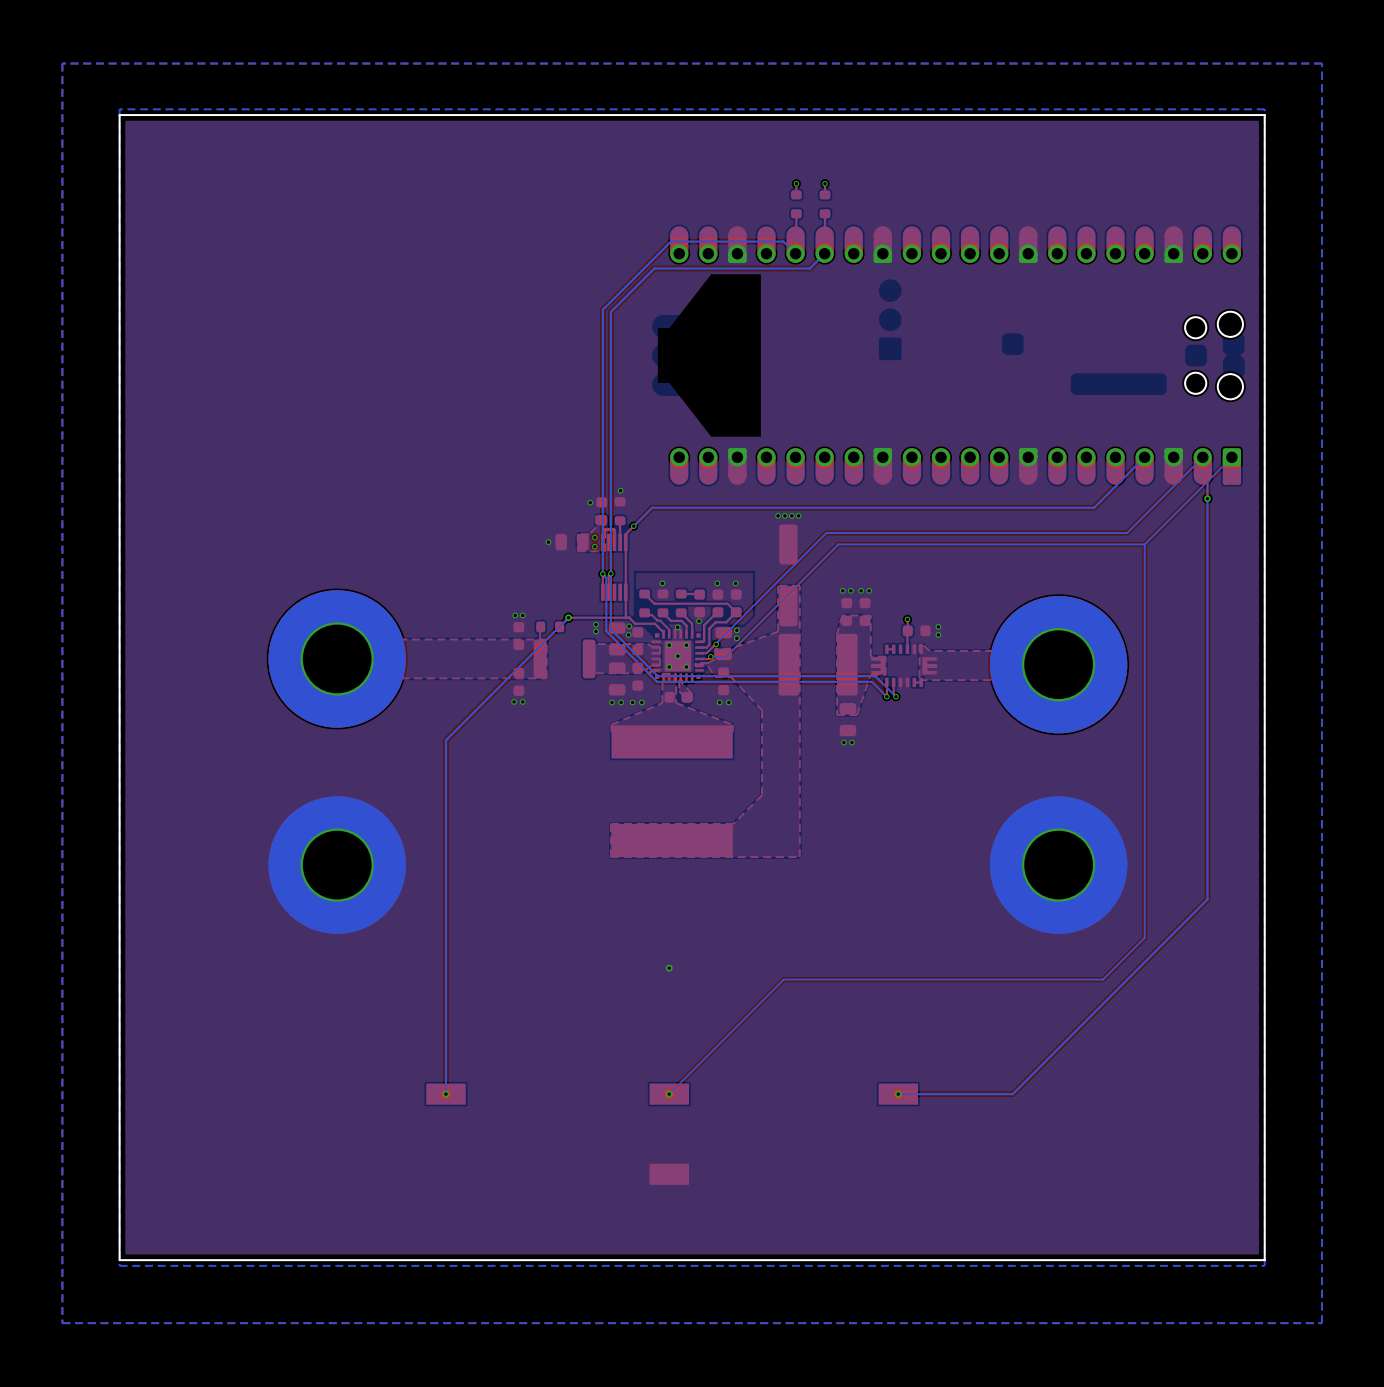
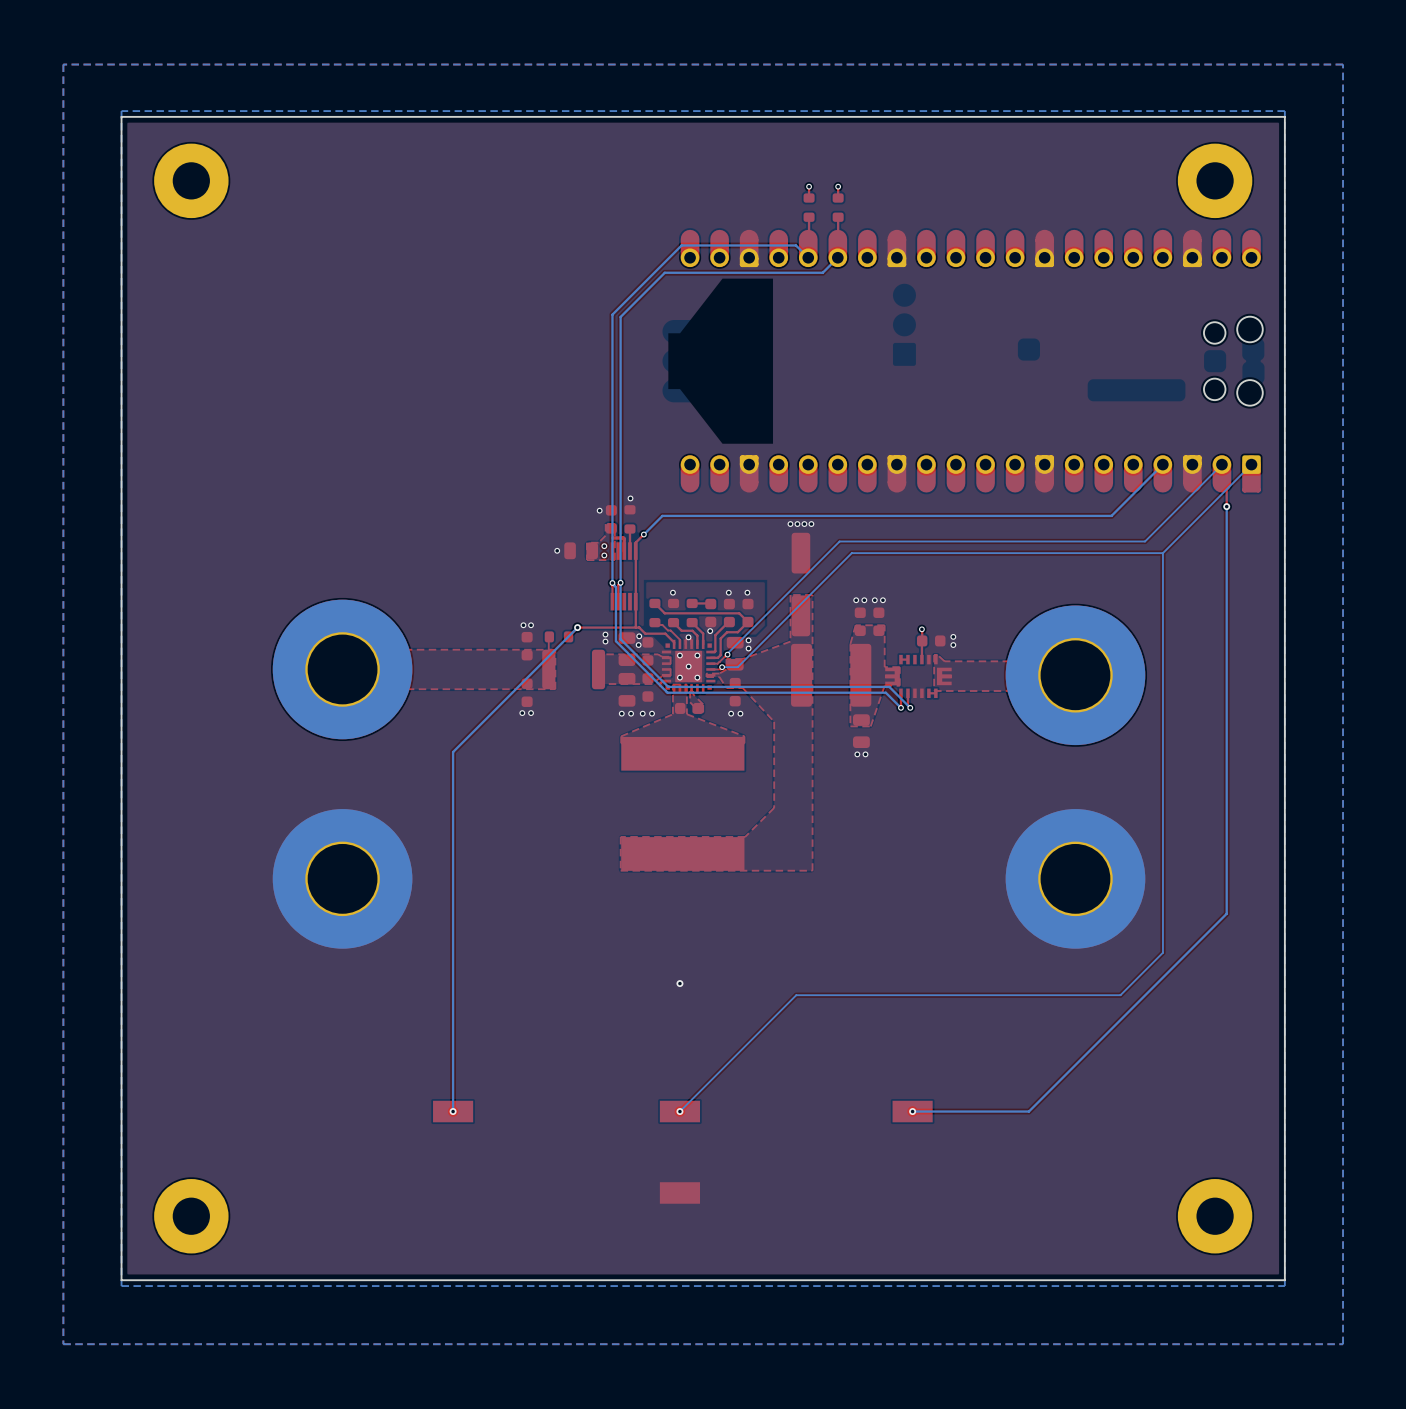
part: none -> (191, 180)
part: none -> (1215, 180)
part: none -> (191, 1216)
part: none -> (1215, 1216)

